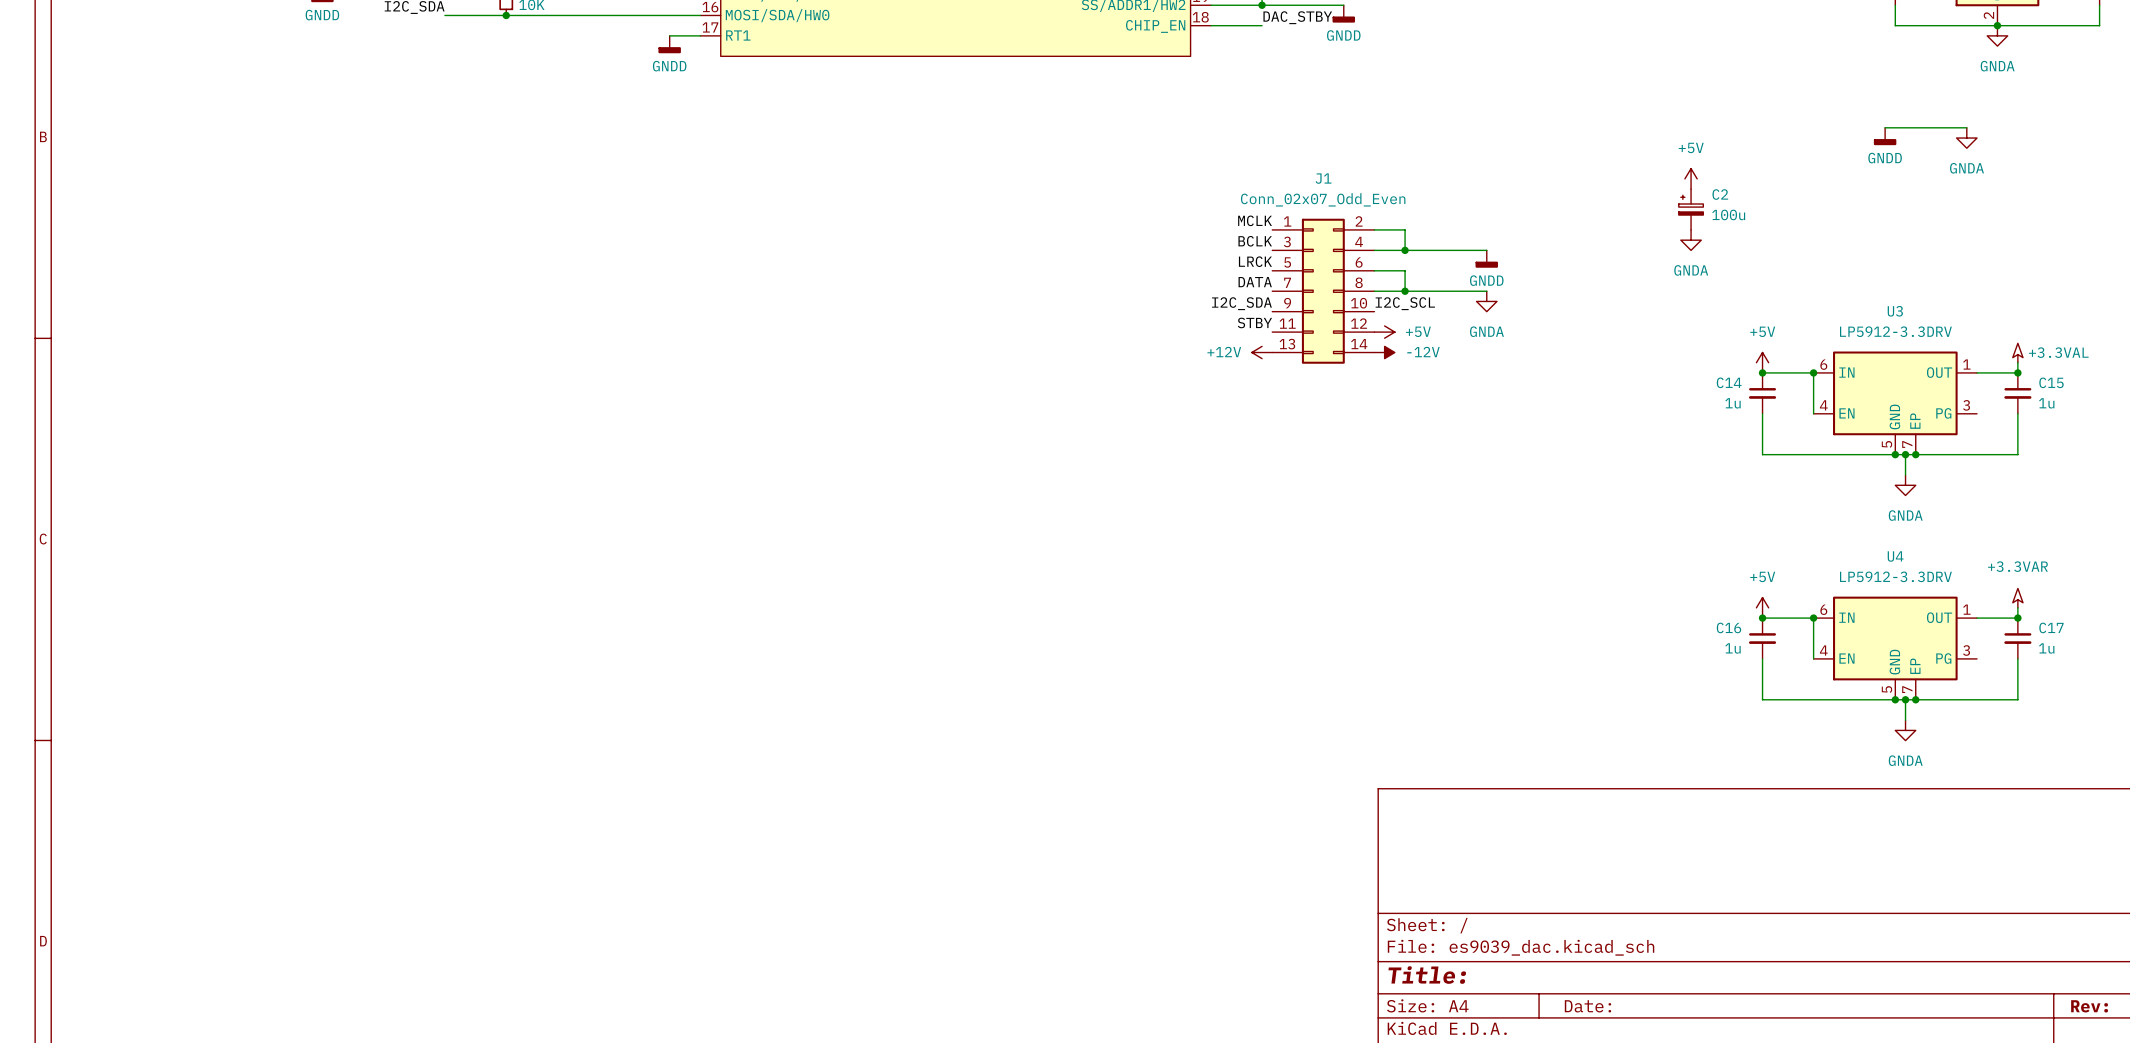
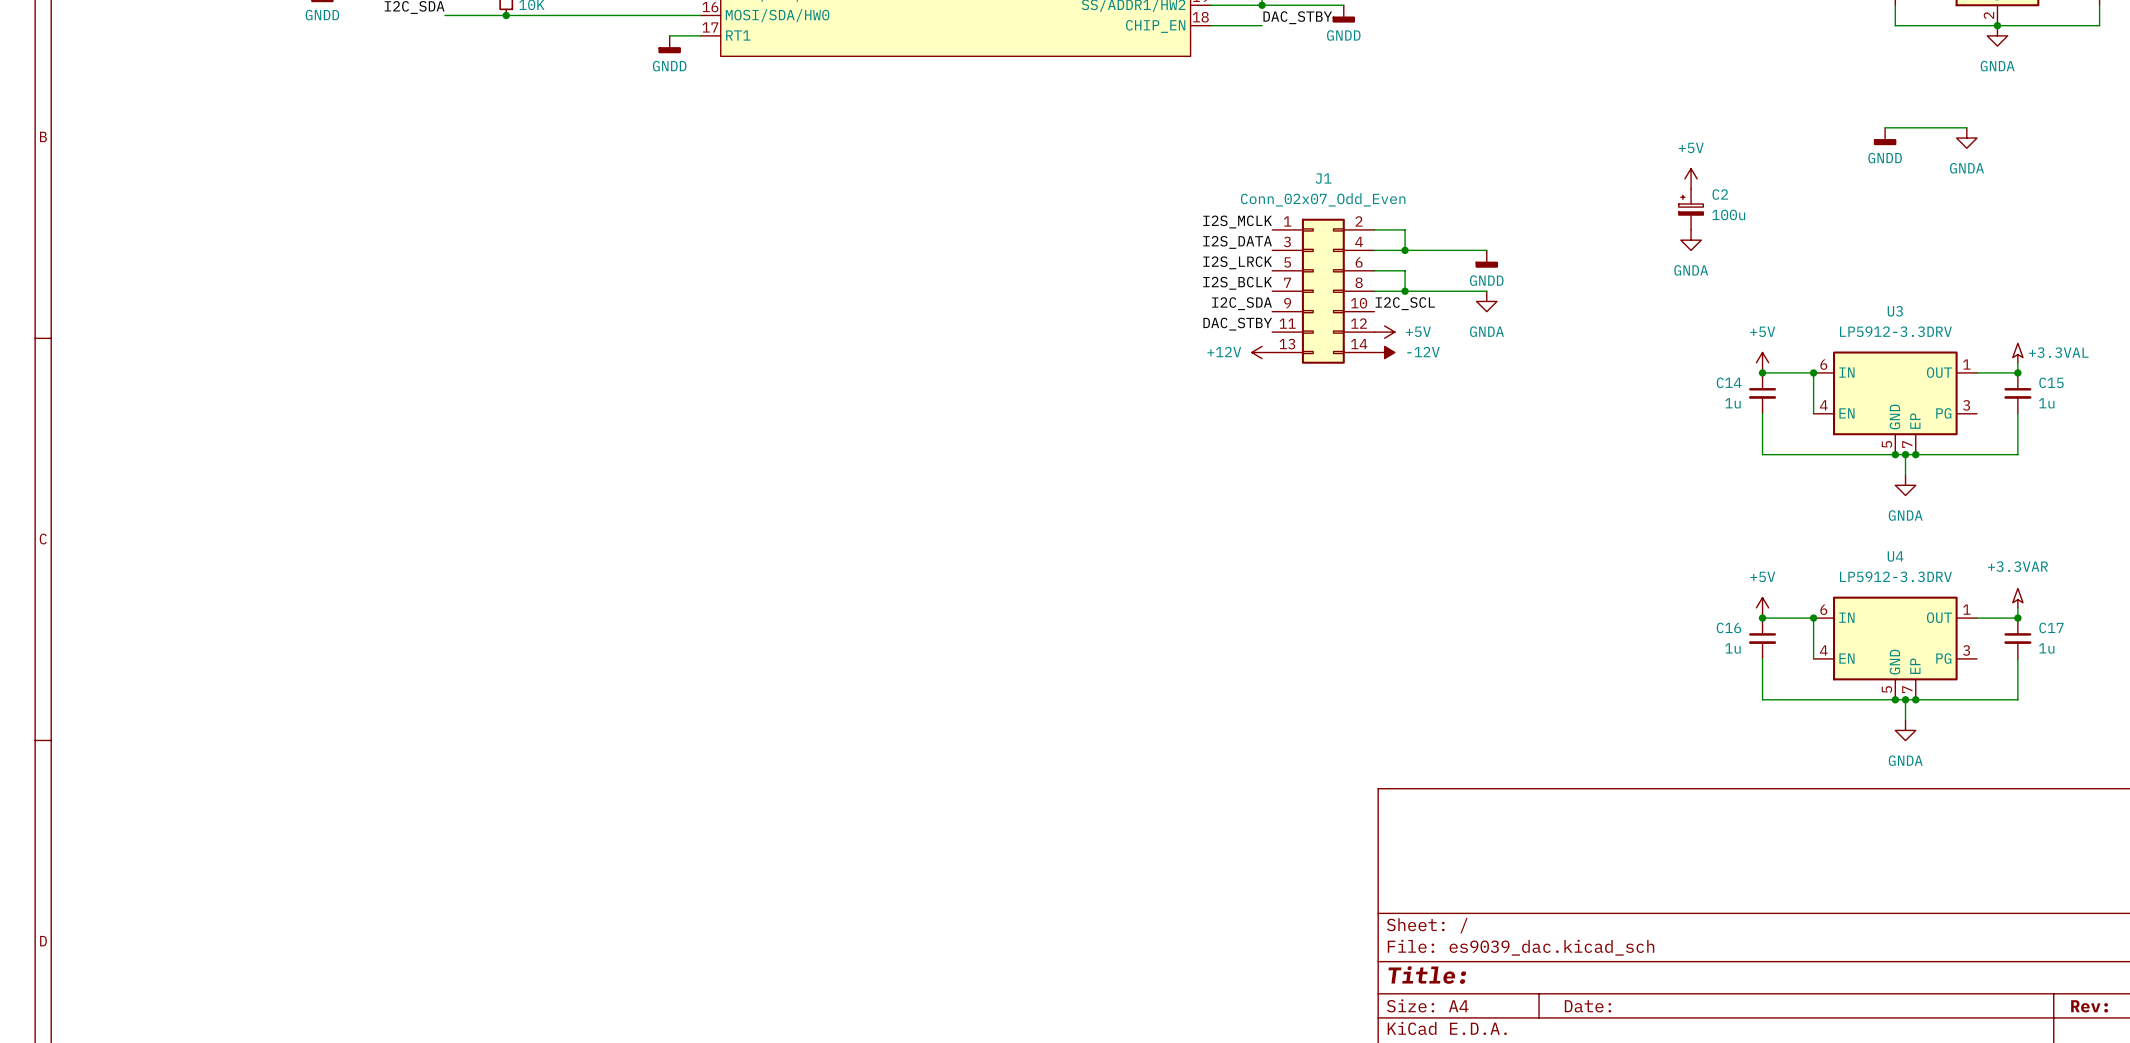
label: MCLK (1255, 220) -> I2S_MCLK (1237, 221)
label: BCLK (1255, 241) -> I2S_DATA (1237, 242)
label: LRCK (1255, 261) -> I2S_LRCK (1237, 262)
label: DATA (1255, 282) -> I2S_BCLK (1237, 283)
label: STBY (1254, 322) -> DAC_STBY (1237, 324)

